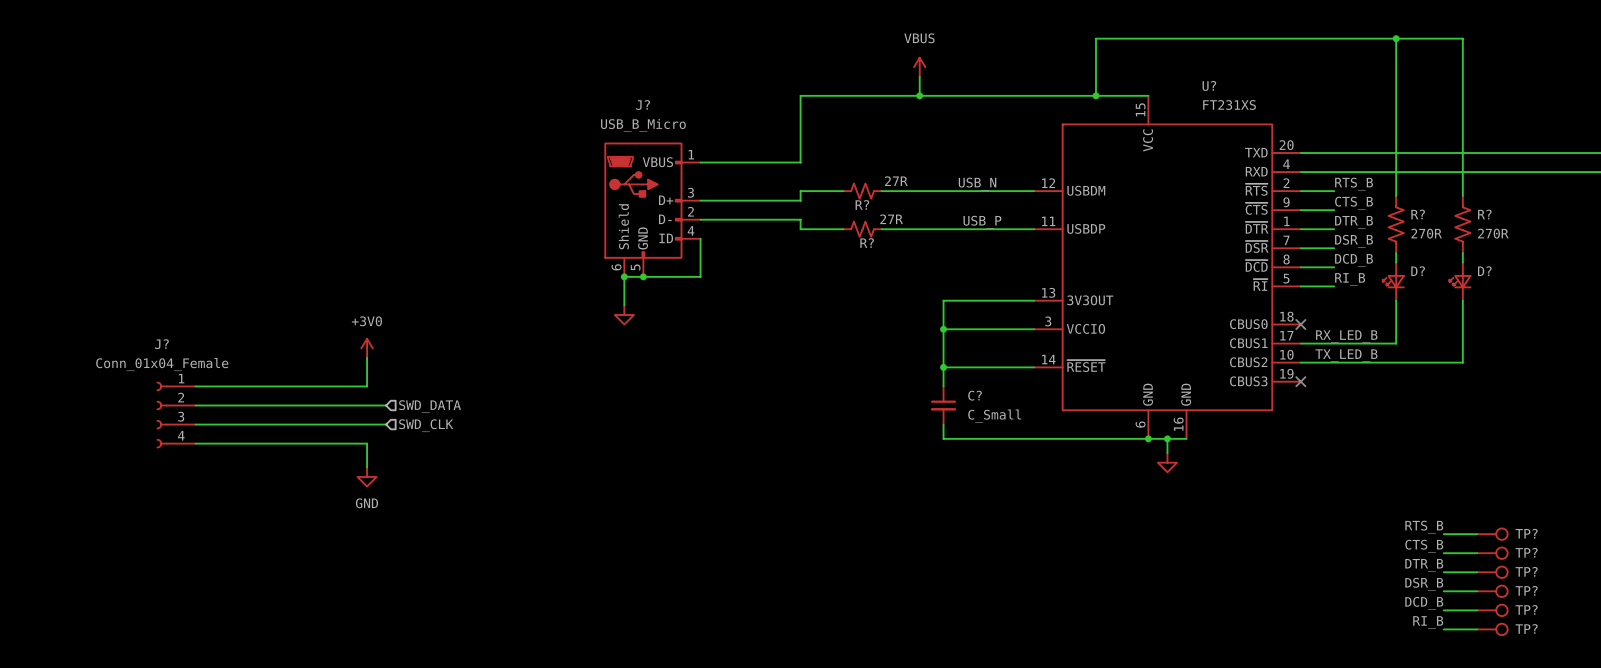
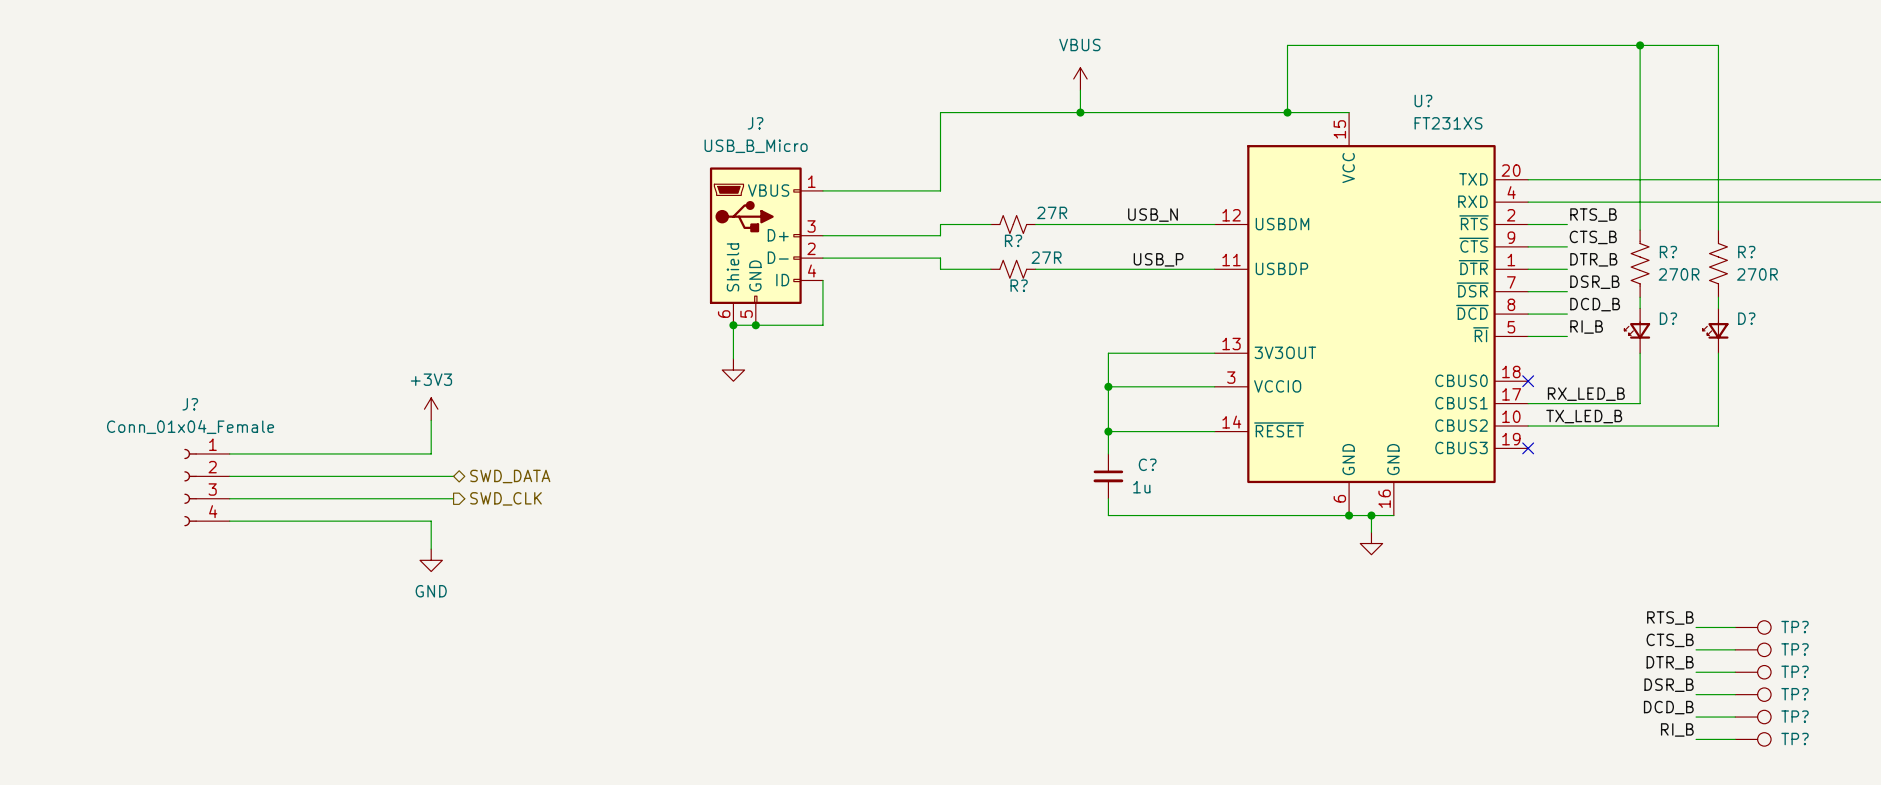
power symbol: +3V0 (367, 348) -> +3V3 (431, 409)
hierarchical label shape: input (430, 406) -> bidirectional (510, 476)
C? value: C_Small (994, 416) -> 1u (1141, 487)
hierarchical label shape: input (426, 425) -> output (506, 498)

